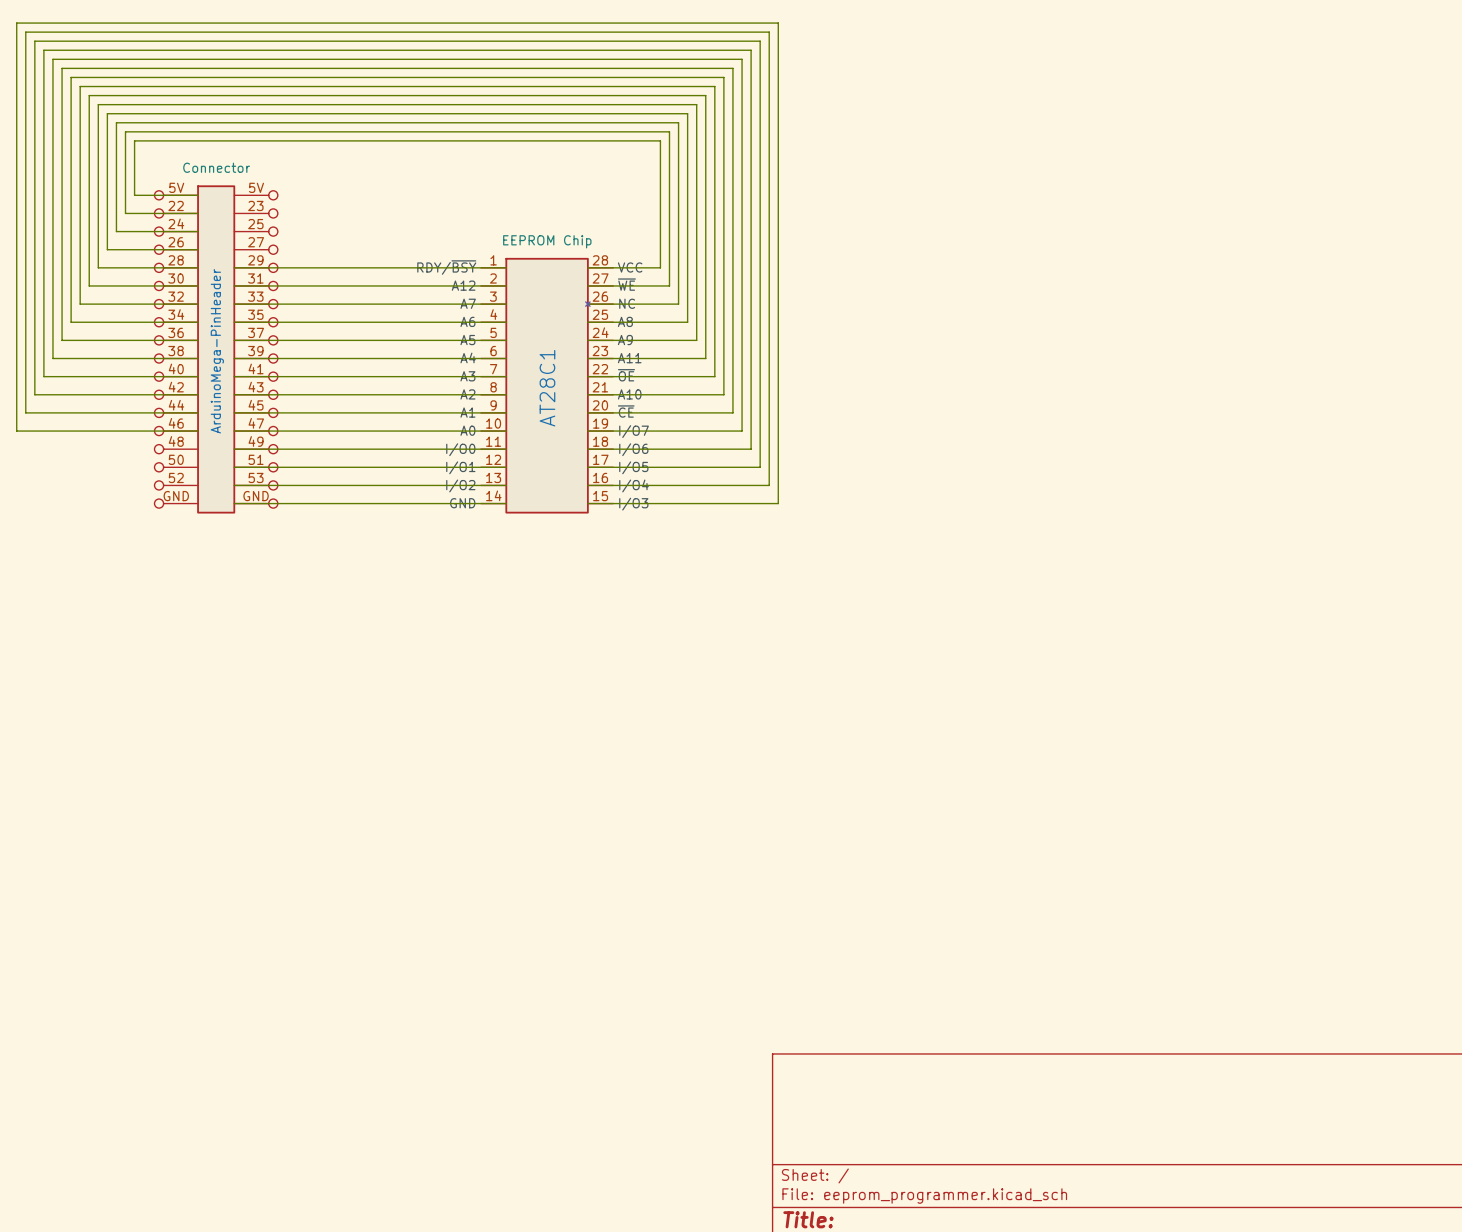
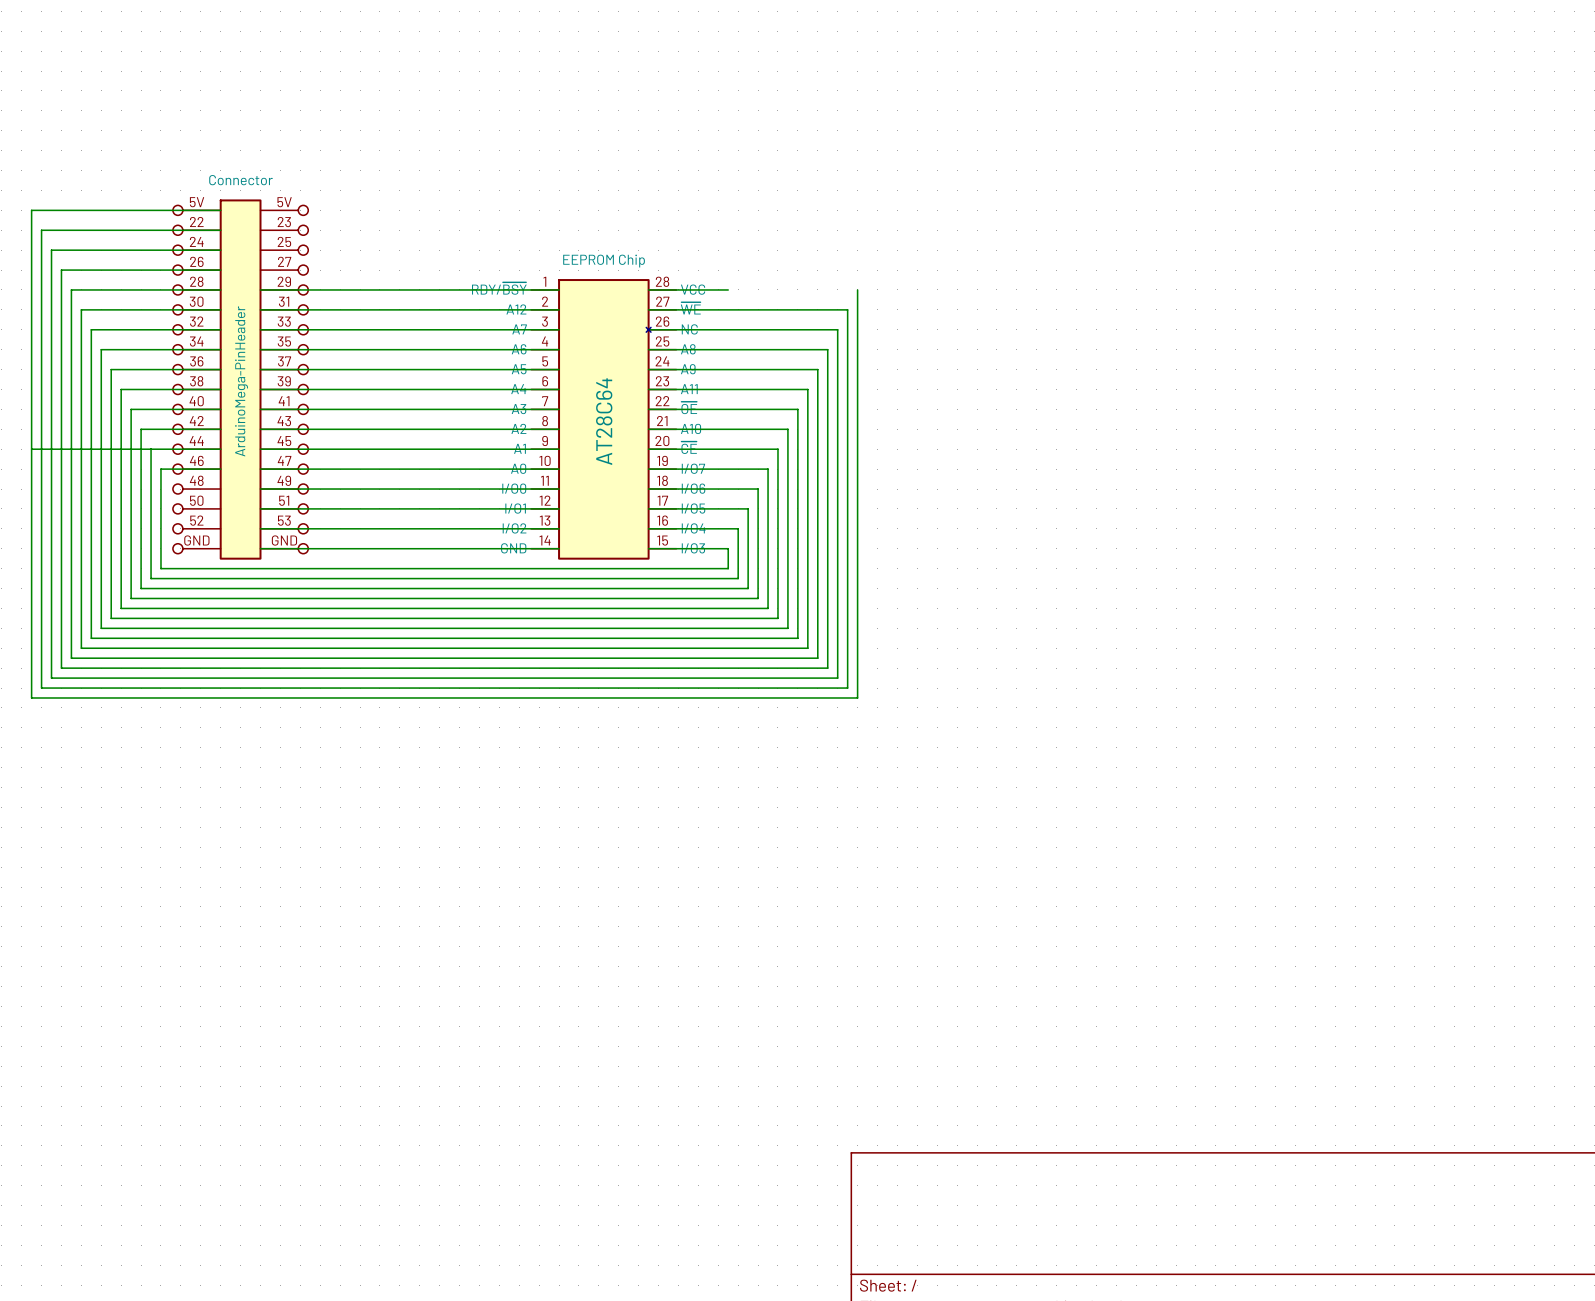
wire: (25, 195) (25, 32) (769, 32) (769, 285) -> (738, 309) (847, 309)
wire: (134, 195) (134, 140) (660, 140) (660, 267) -> (151, 210) (31, 210)
wire: (34, 213) (34, 41) (760, 41) (760, 304) -> (748, 329) (837, 329)
wire: (125, 213) (125, 131) (669, 131) (669, 285) -> (141, 230) (41, 230)
wire: (43, 231) (43, 50) (751, 50) (751, 322) -> (758, 349) (827, 349)
wire: (116, 231) (116, 122) (678, 122) (678, 304) -> (131, 250) (51, 250)
wire: (52, 249) (52, 59) (742, 59) (742, 340) -> (768, 369) (817, 369)
wire: (107, 249) (107, 113) (687, 113) (687, 322) -> (121, 270) (61, 270)
wire: (62, 267) (62, 68) (732, 68) (732, 358) -> (777, 389) (807, 389)
wire: (98, 267) (98, 104) (696, 104) (696, 340) -> (111, 289) (71, 289)
wire: (778, 267) (778, 23) (16, 23) (16, 431) (143, 431) -> (728, 548) (728, 568) (160, 568) (160, 469)
wire: (71, 285) (71, 77) (723, 77) (723, 376) -> (787, 409) (797, 409)
wire: (89, 285) (89, 95) (705, 95) (705, 358) -> (101, 309) (81, 309)
wire: (80, 304) (80, 86) (714, 86) (714, 376) -> (91, 329) (91, 638) (797, 638) (797, 429)
wire: (71, 322) (89, 322) -> (81, 349) (81, 648) (807, 648) (807, 449)
wire: (62, 340) (98, 340) -> (71, 369) (71, 658) (817, 658) (817, 469)
wire: (52, 358) (107, 358) -> (61, 389) (61, 668) (827, 668) (827, 489)
wire: (43, 376) (116, 376) -> (51, 409) (51, 678) (837, 678) (837, 508)
AT28C1 name: AT28C1 (547, 388) -> AT28C64 (604, 421)
wire: (34, 394) (125, 394) -> (41, 429) (41, 688) (847, 688) (847, 528)
wire: (714, 394) (723, 394) -> (787, 429) (787, 628) (101, 628) (101, 349)
wire: (705, 412) (732, 412) -> (777, 449) (777, 618) (111, 618) (111, 369)
wire: (696, 431) (742, 431) -> (768, 469) (768, 608) (121, 608) (121, 389)
wire: (687, 449) (751, 449) -> (758, 489) (758, 598) (131, 598) (131, 409)
wire: (678, 467) (760, 467) -> (748, 508) (748, 588) (141, 588) (141, 429)
wire: (669, 485) (769, 485) -> (738, 528) (738, 578) (151, 578) (151, 449)
wire: (660, 503) (778, 503) -> (31, 449) (31, 697) (857, 697) (857, 548)

